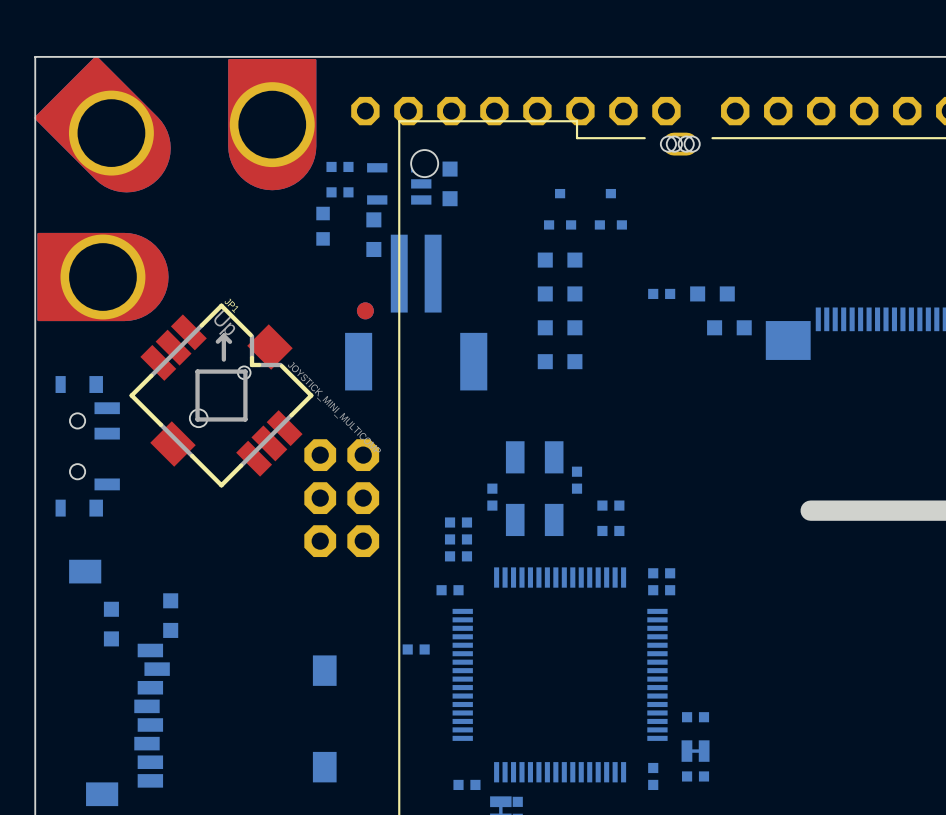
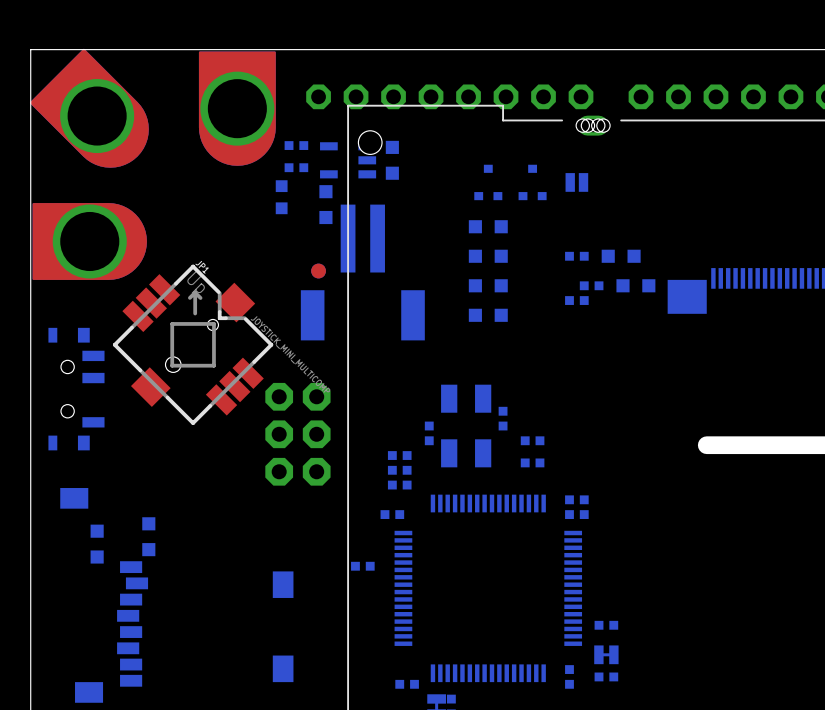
part: none -> (576, 182)
part: none -> (591, 285)
part: none -> (576, 300)

